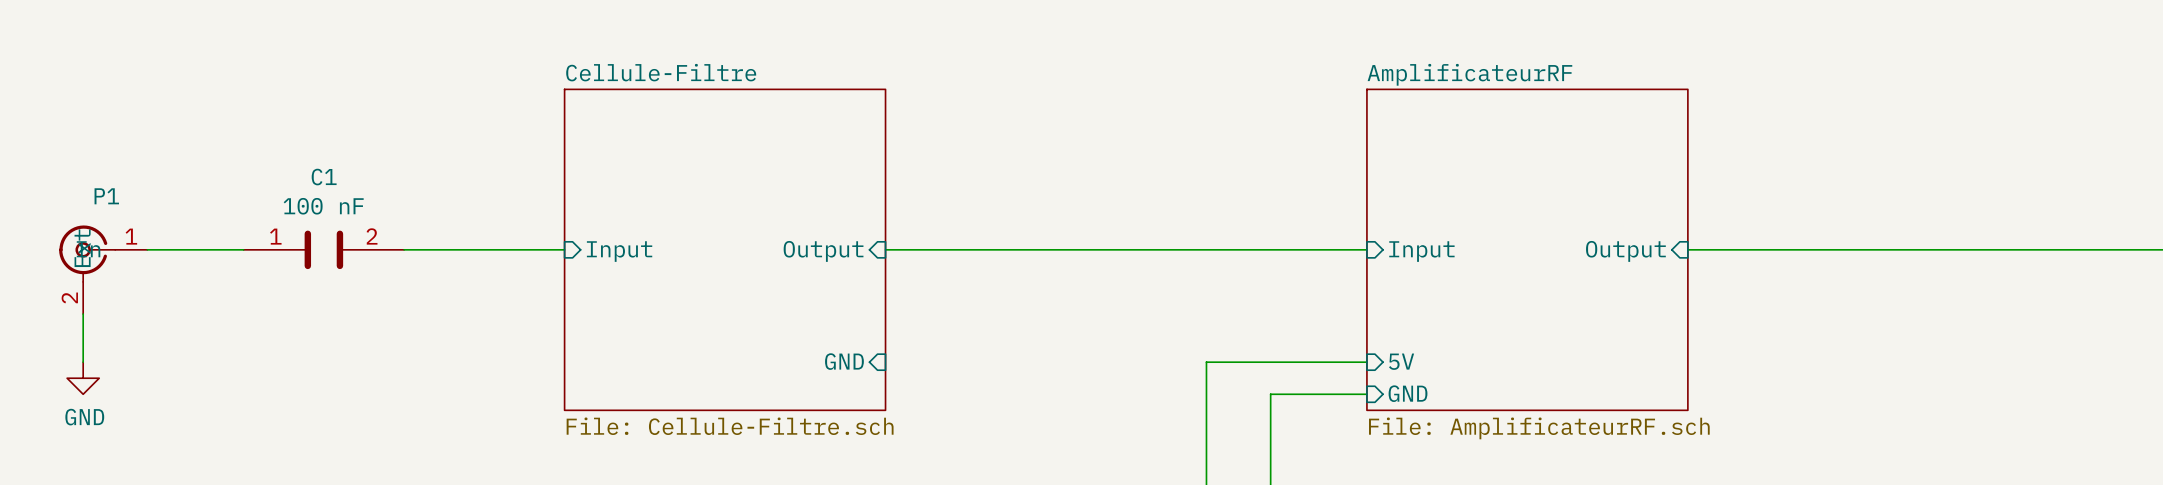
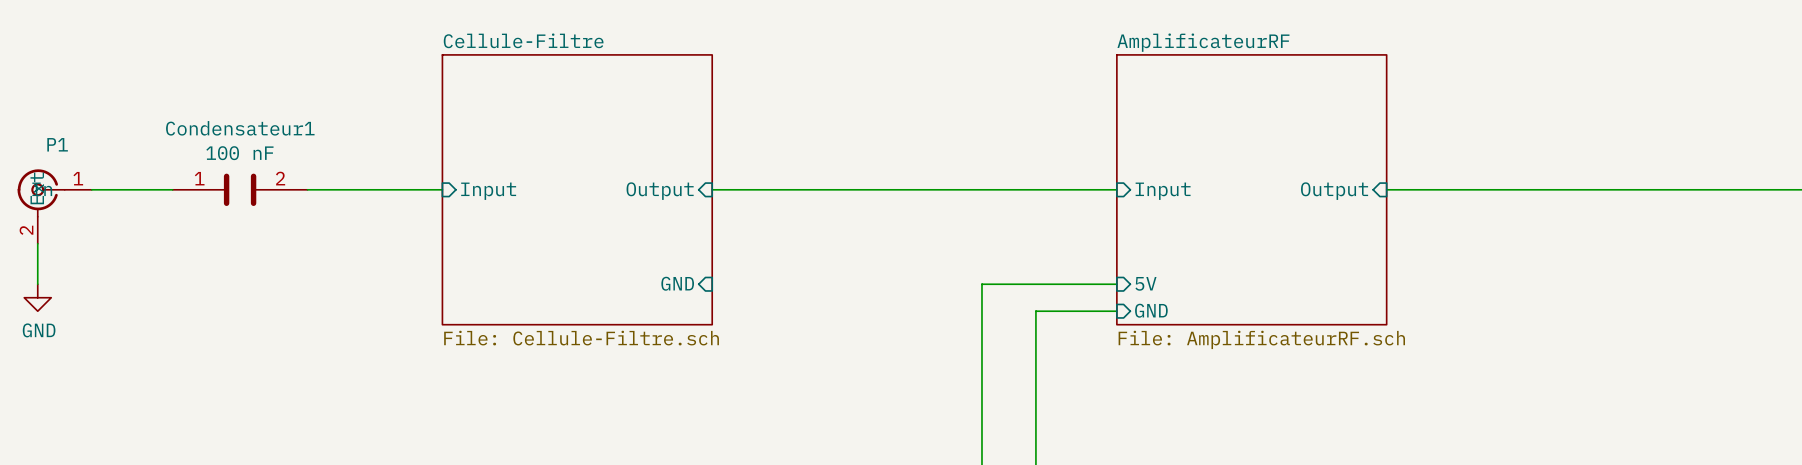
C1 name: C1 (324, 177) -> Condensateur1 (240, 128)

